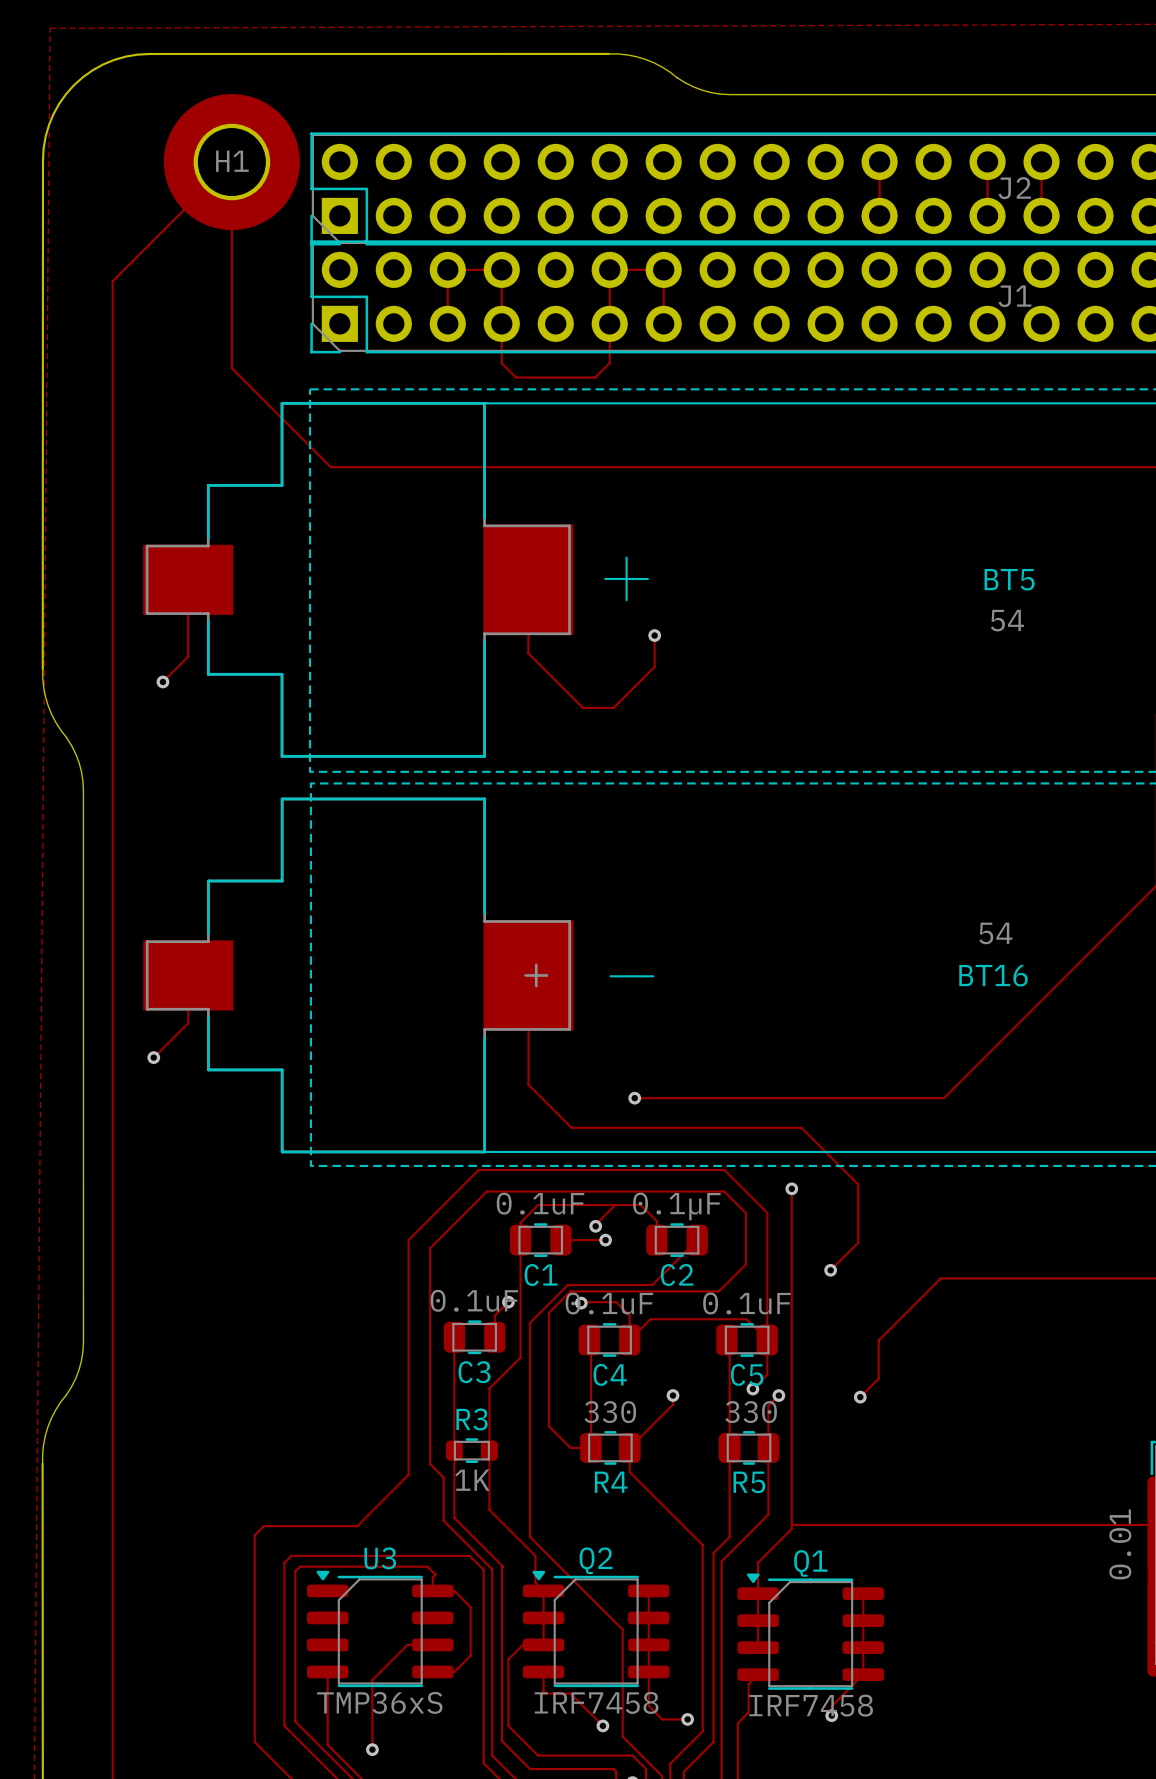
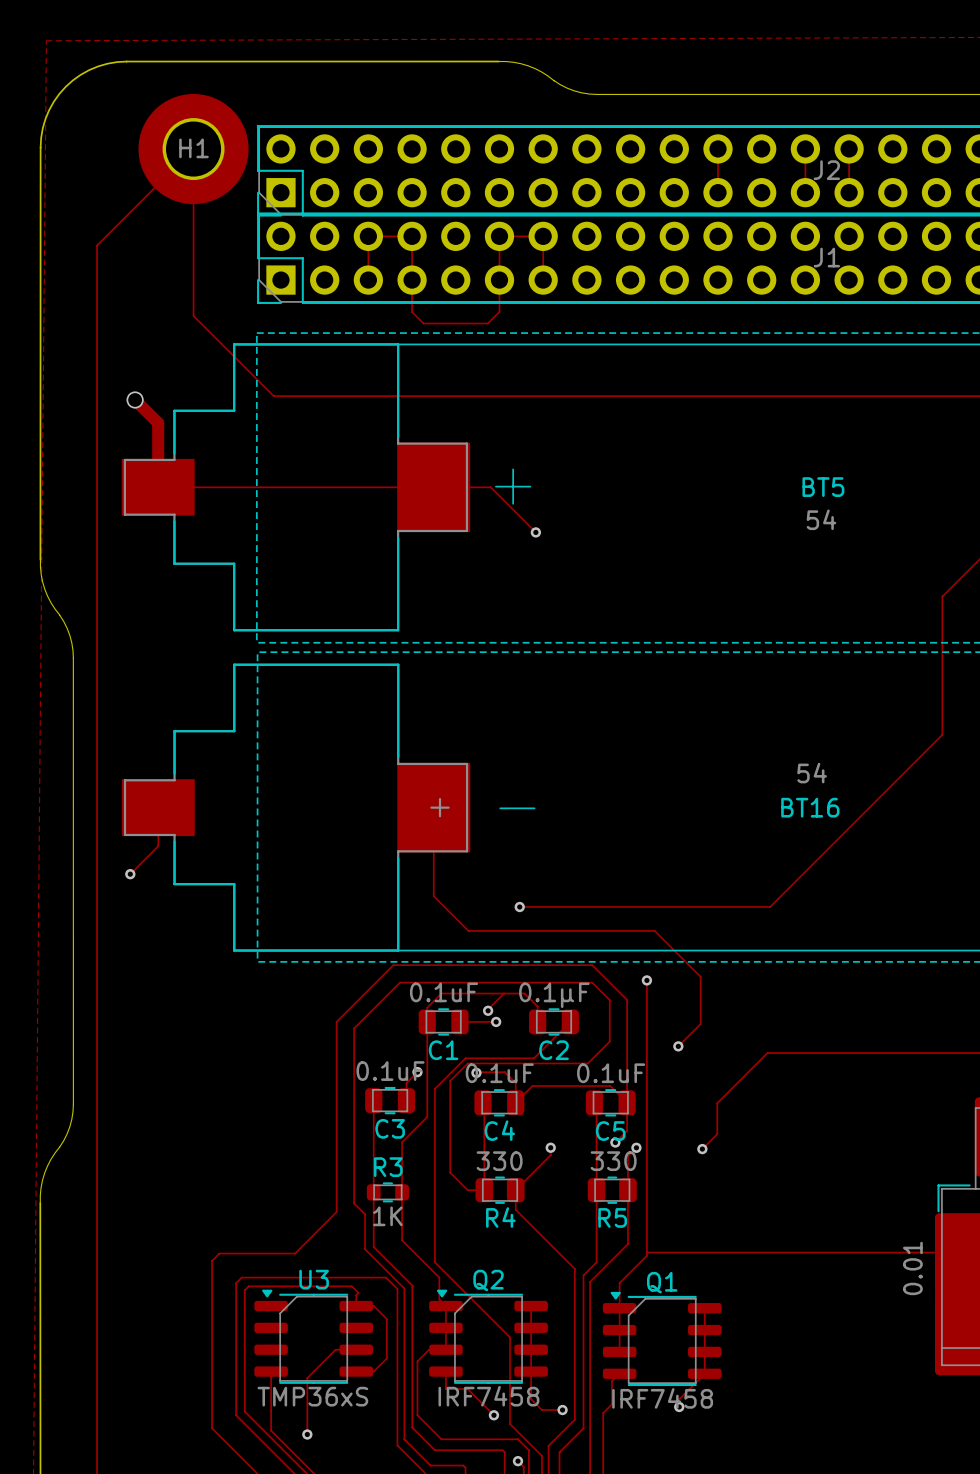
via: none -> (135, 400)
track: (188, 579) (188, 656) (162, 681) -> none
track: (528, 579) (528, 653) (582, 707) (613, 707) (654, 666) (654, 635) -> (135, 400) (158, 423) (158, 487) (490, 487) (535, 532)
via: (162, 681) -> none

